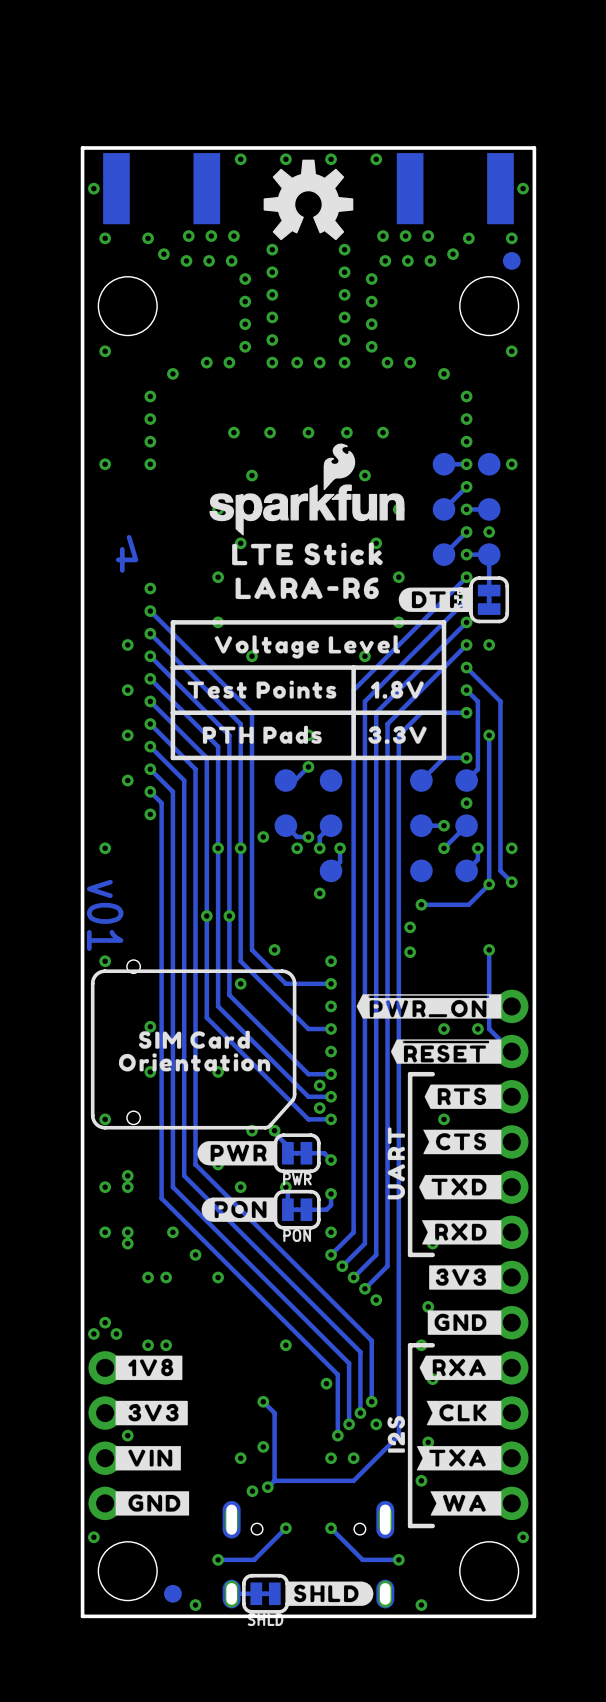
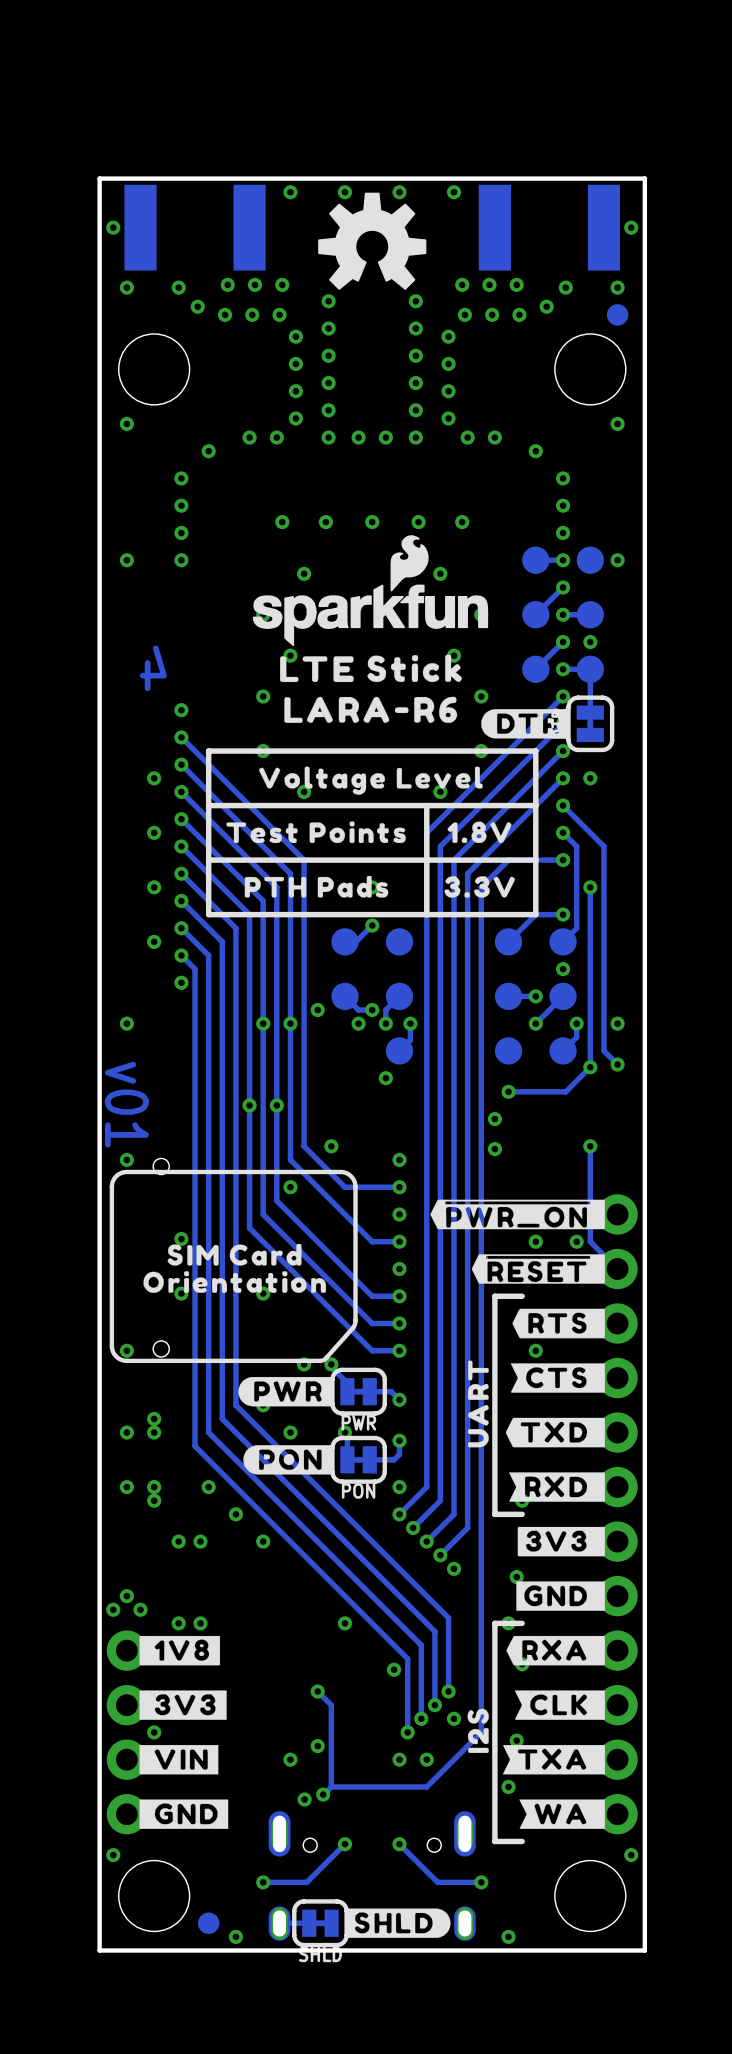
via: (319, 1085) -> none
via: (319, 1108) -> none

